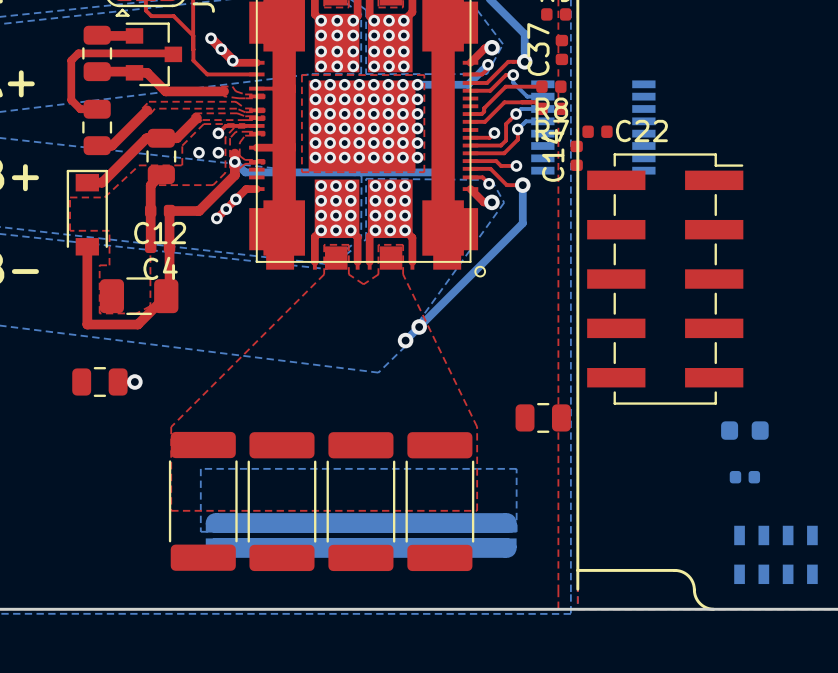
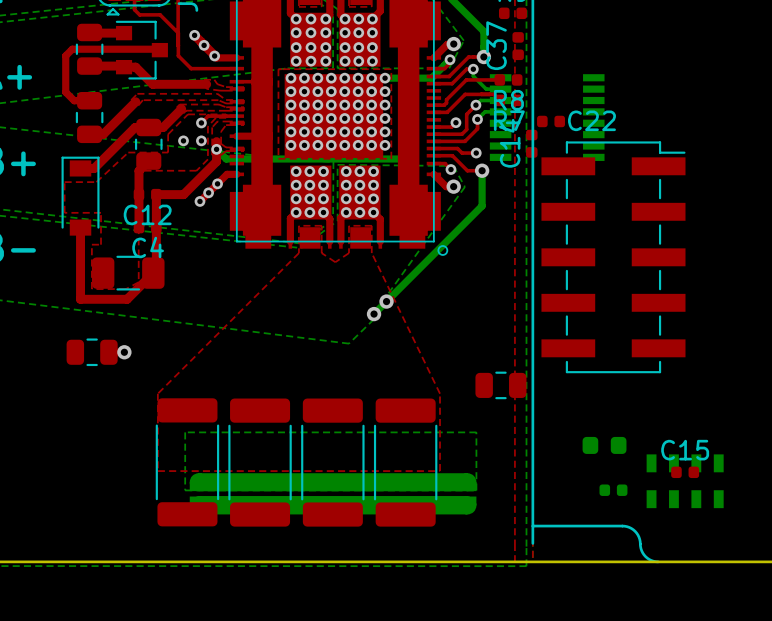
part position: (744, 430) -> (604, 445)
C15 side: bottom (744, 477) -> top (685, 472)
part: none -> (613, 490)
part position: (775, 554) -> (685, 481)

